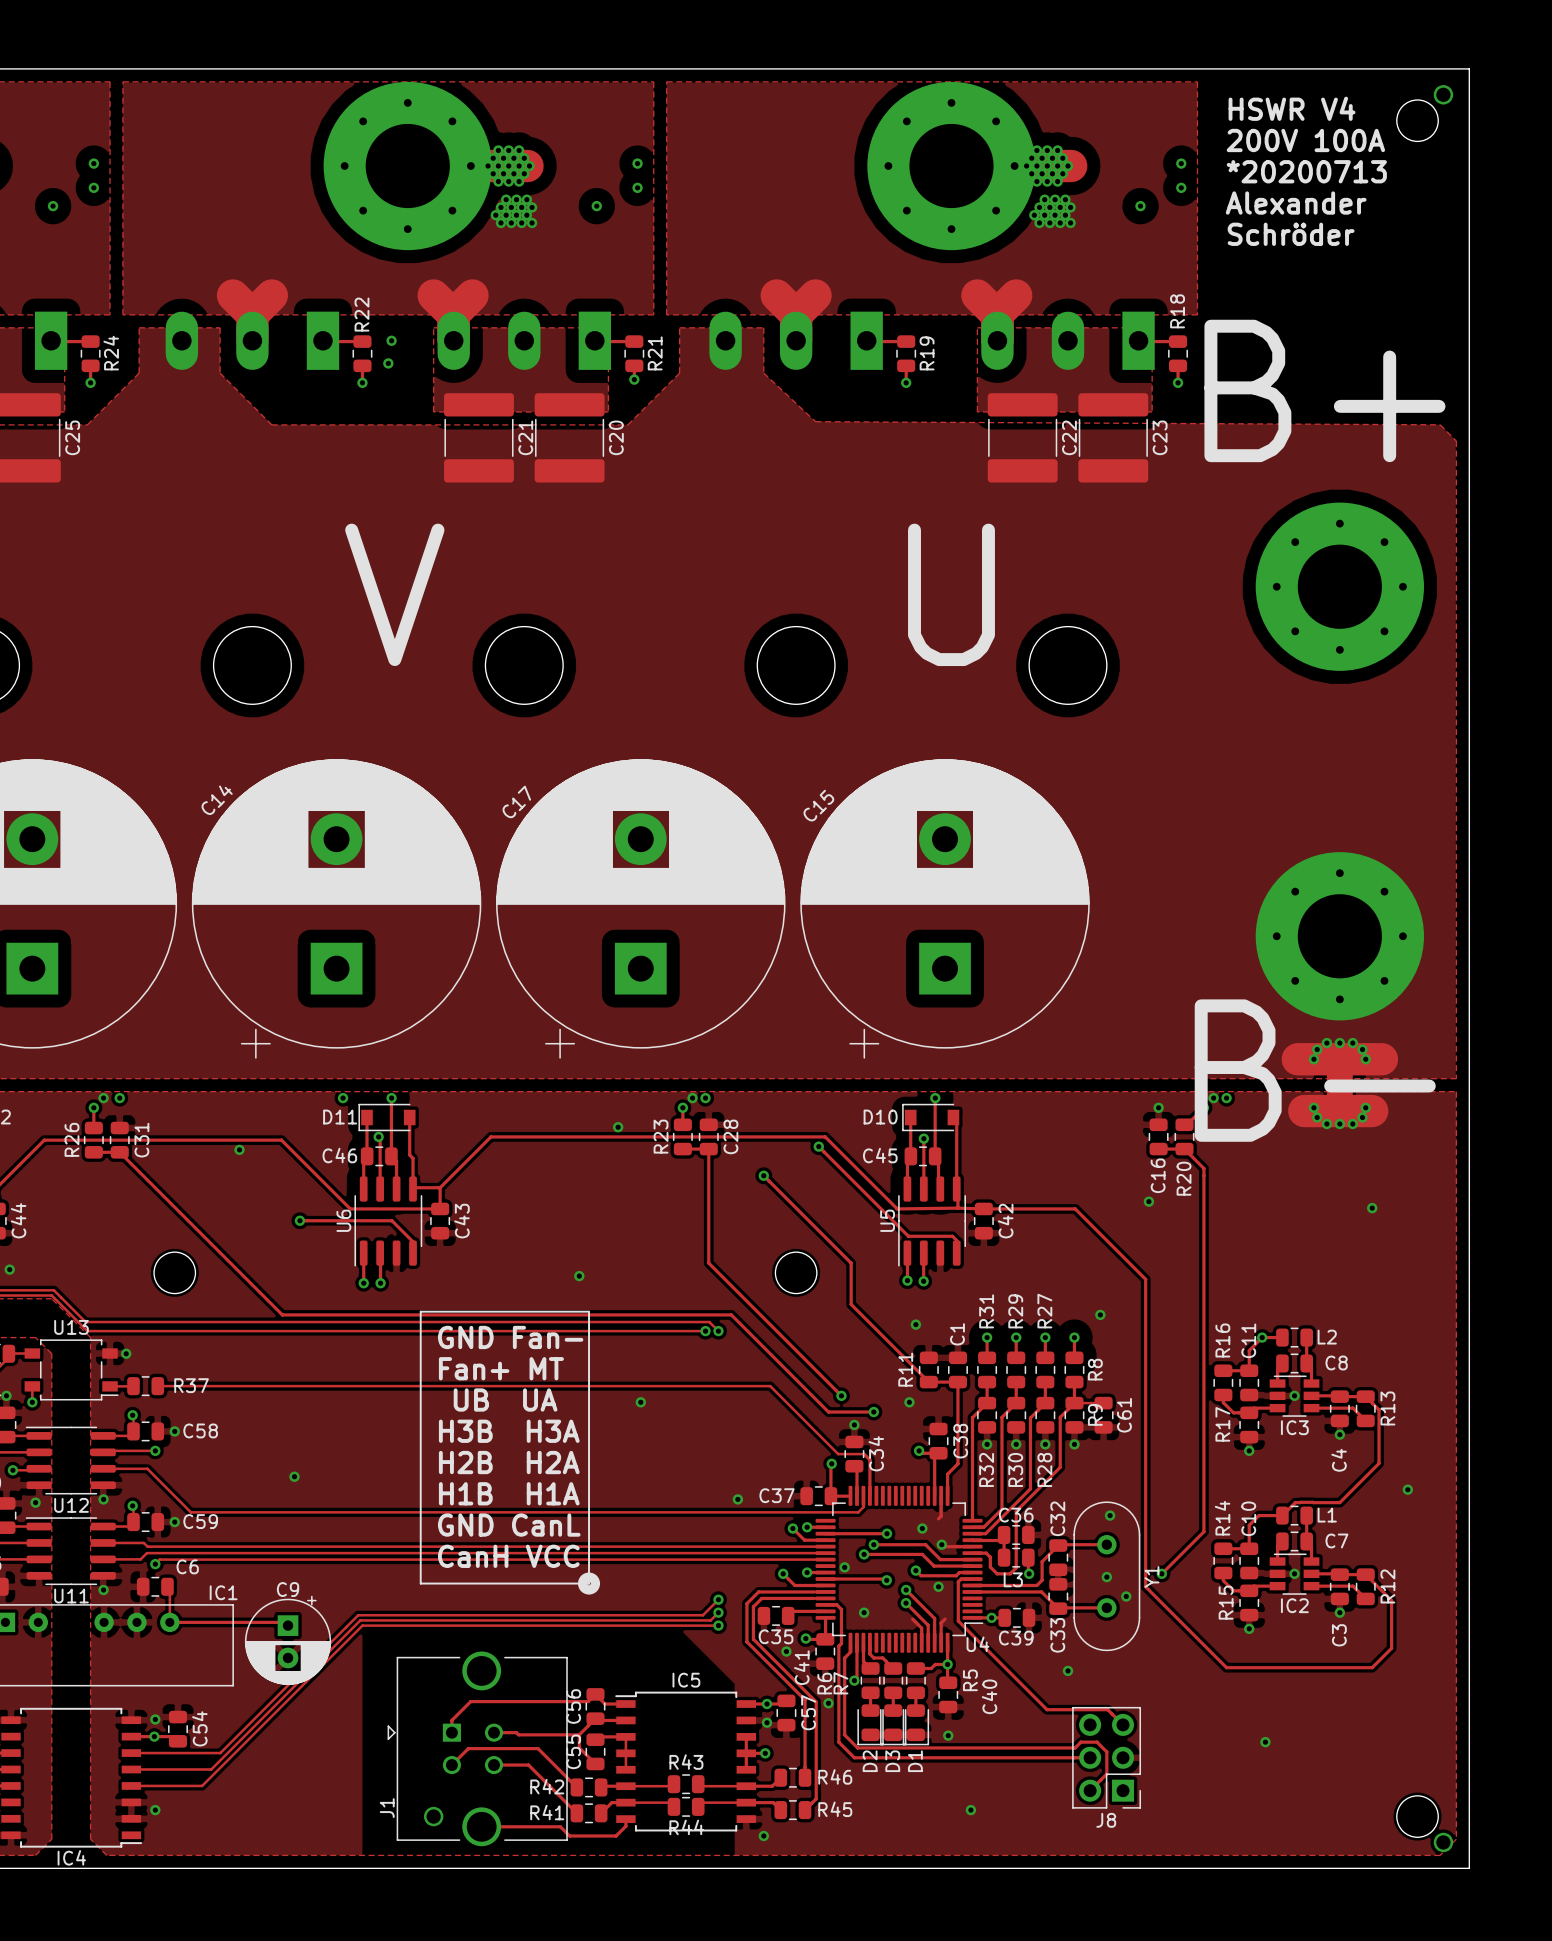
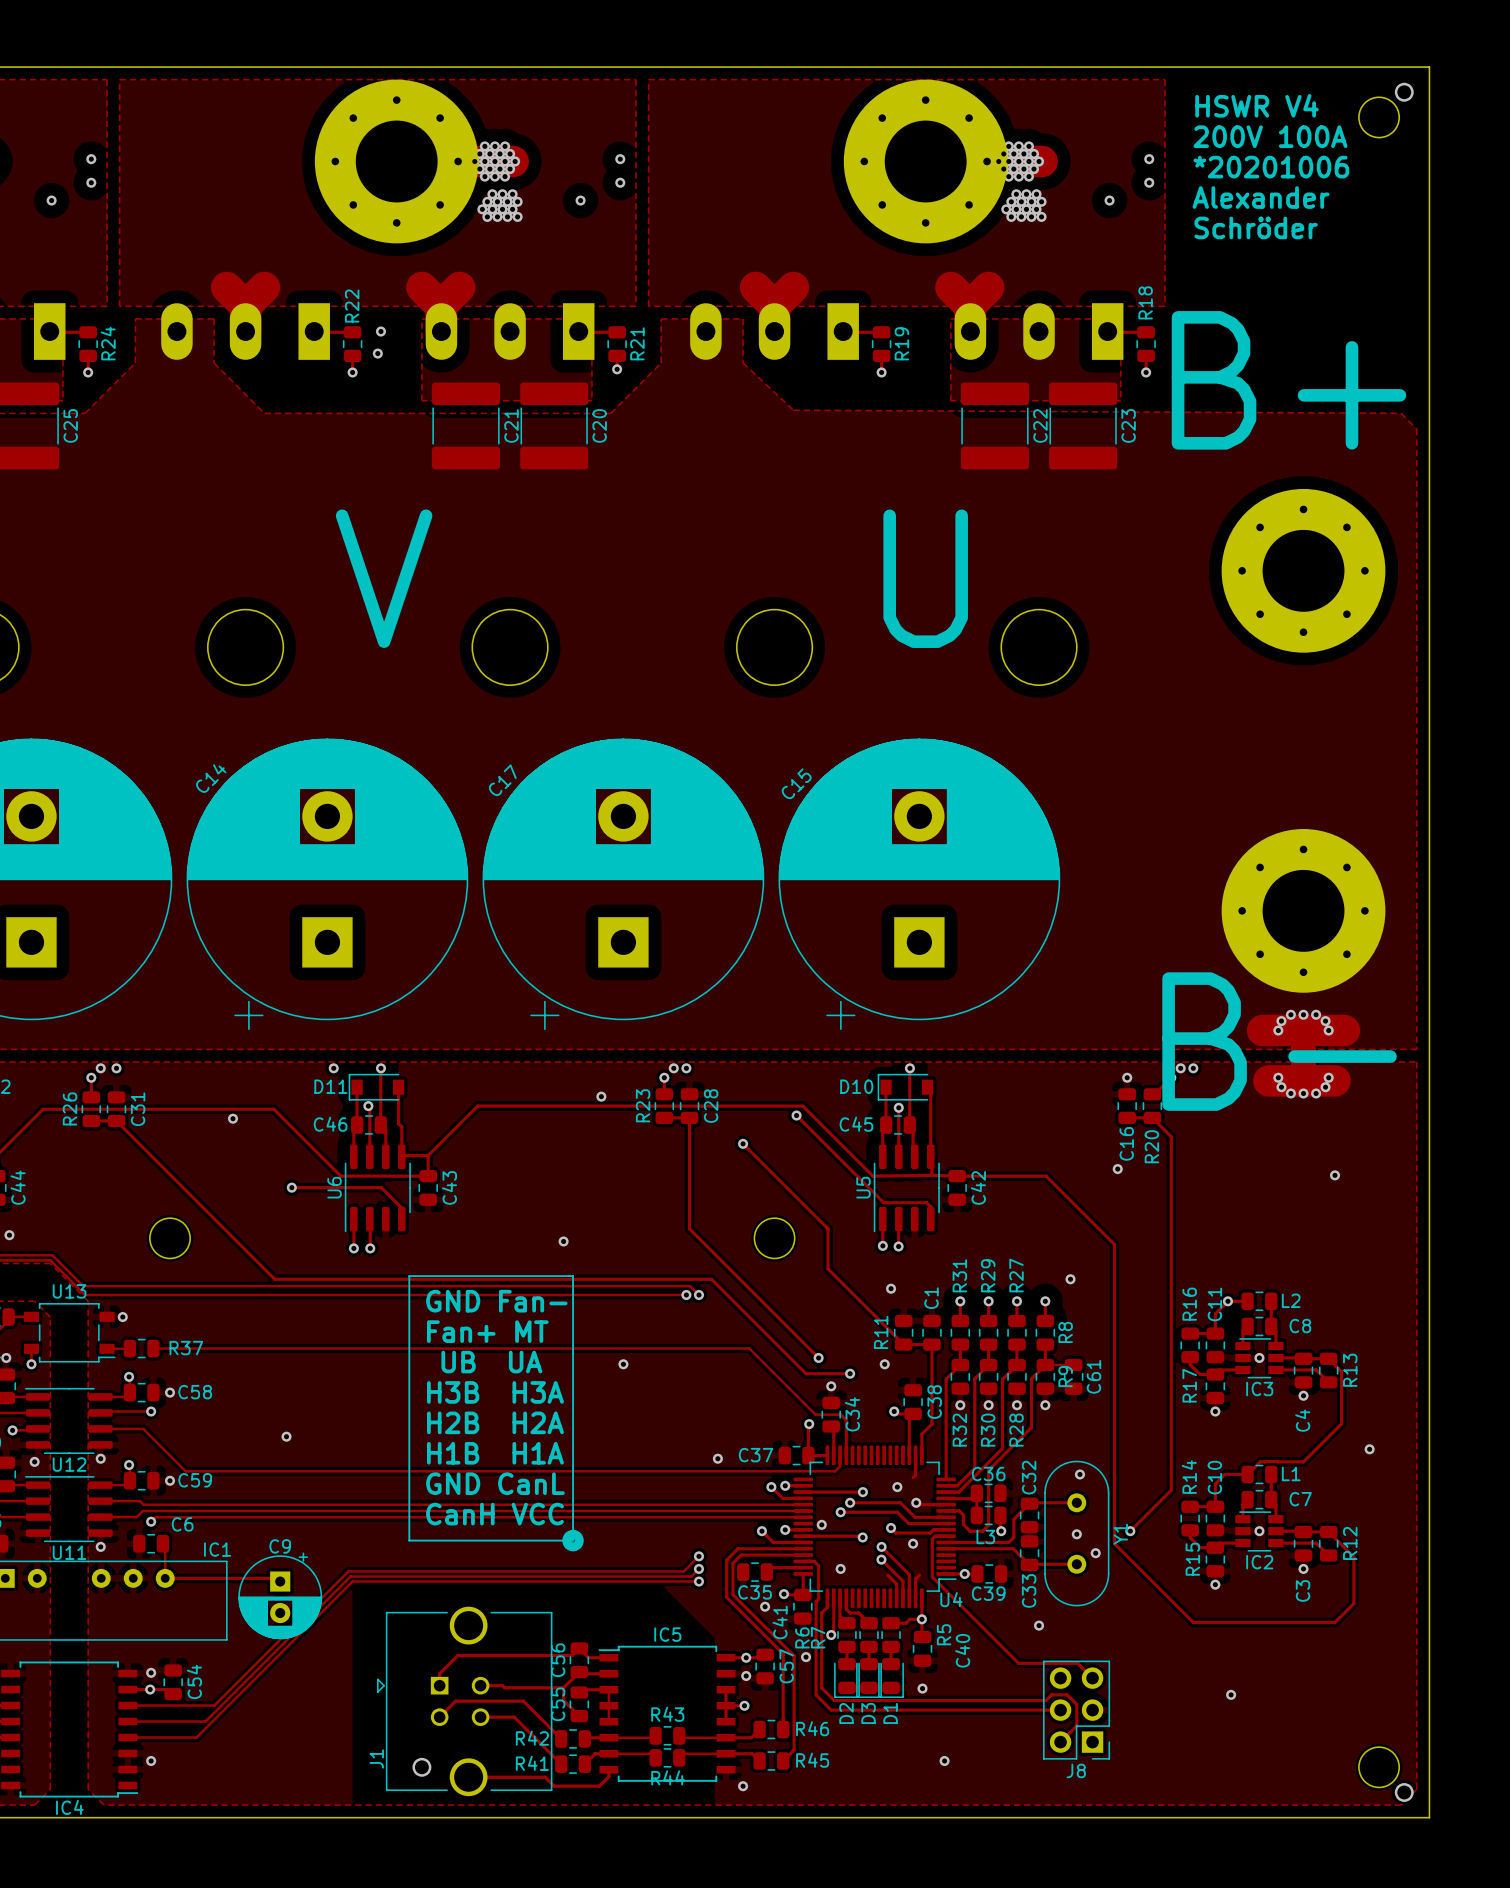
text: *20200713 (1306, 171) -> *20201006 (1271, 167)

